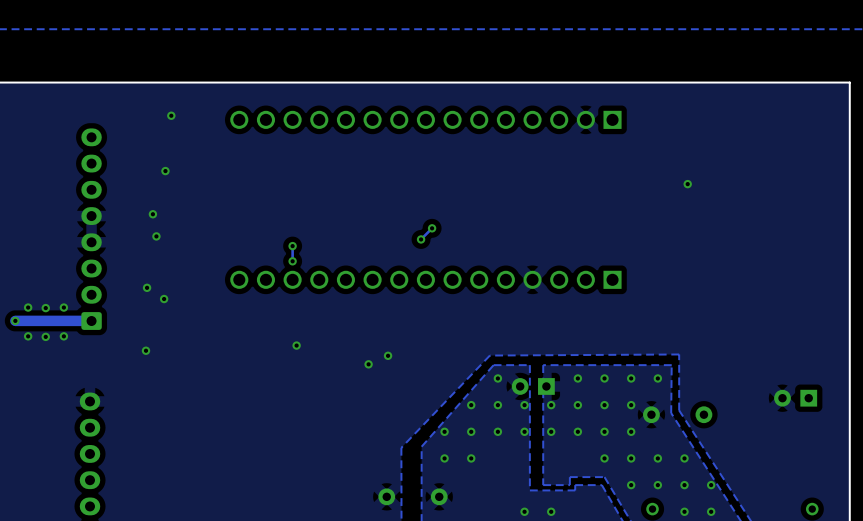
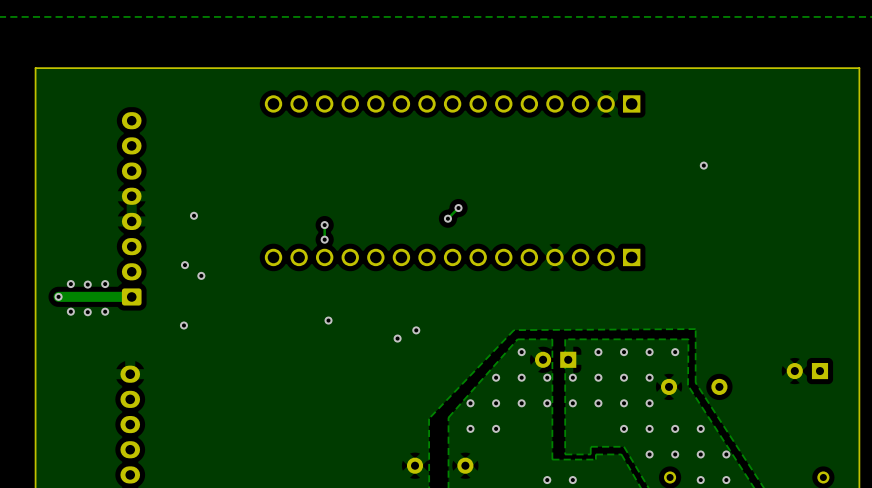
via: (171, 115) -> none
via: (165, 171) -> none
via: (152, 214) -> none

